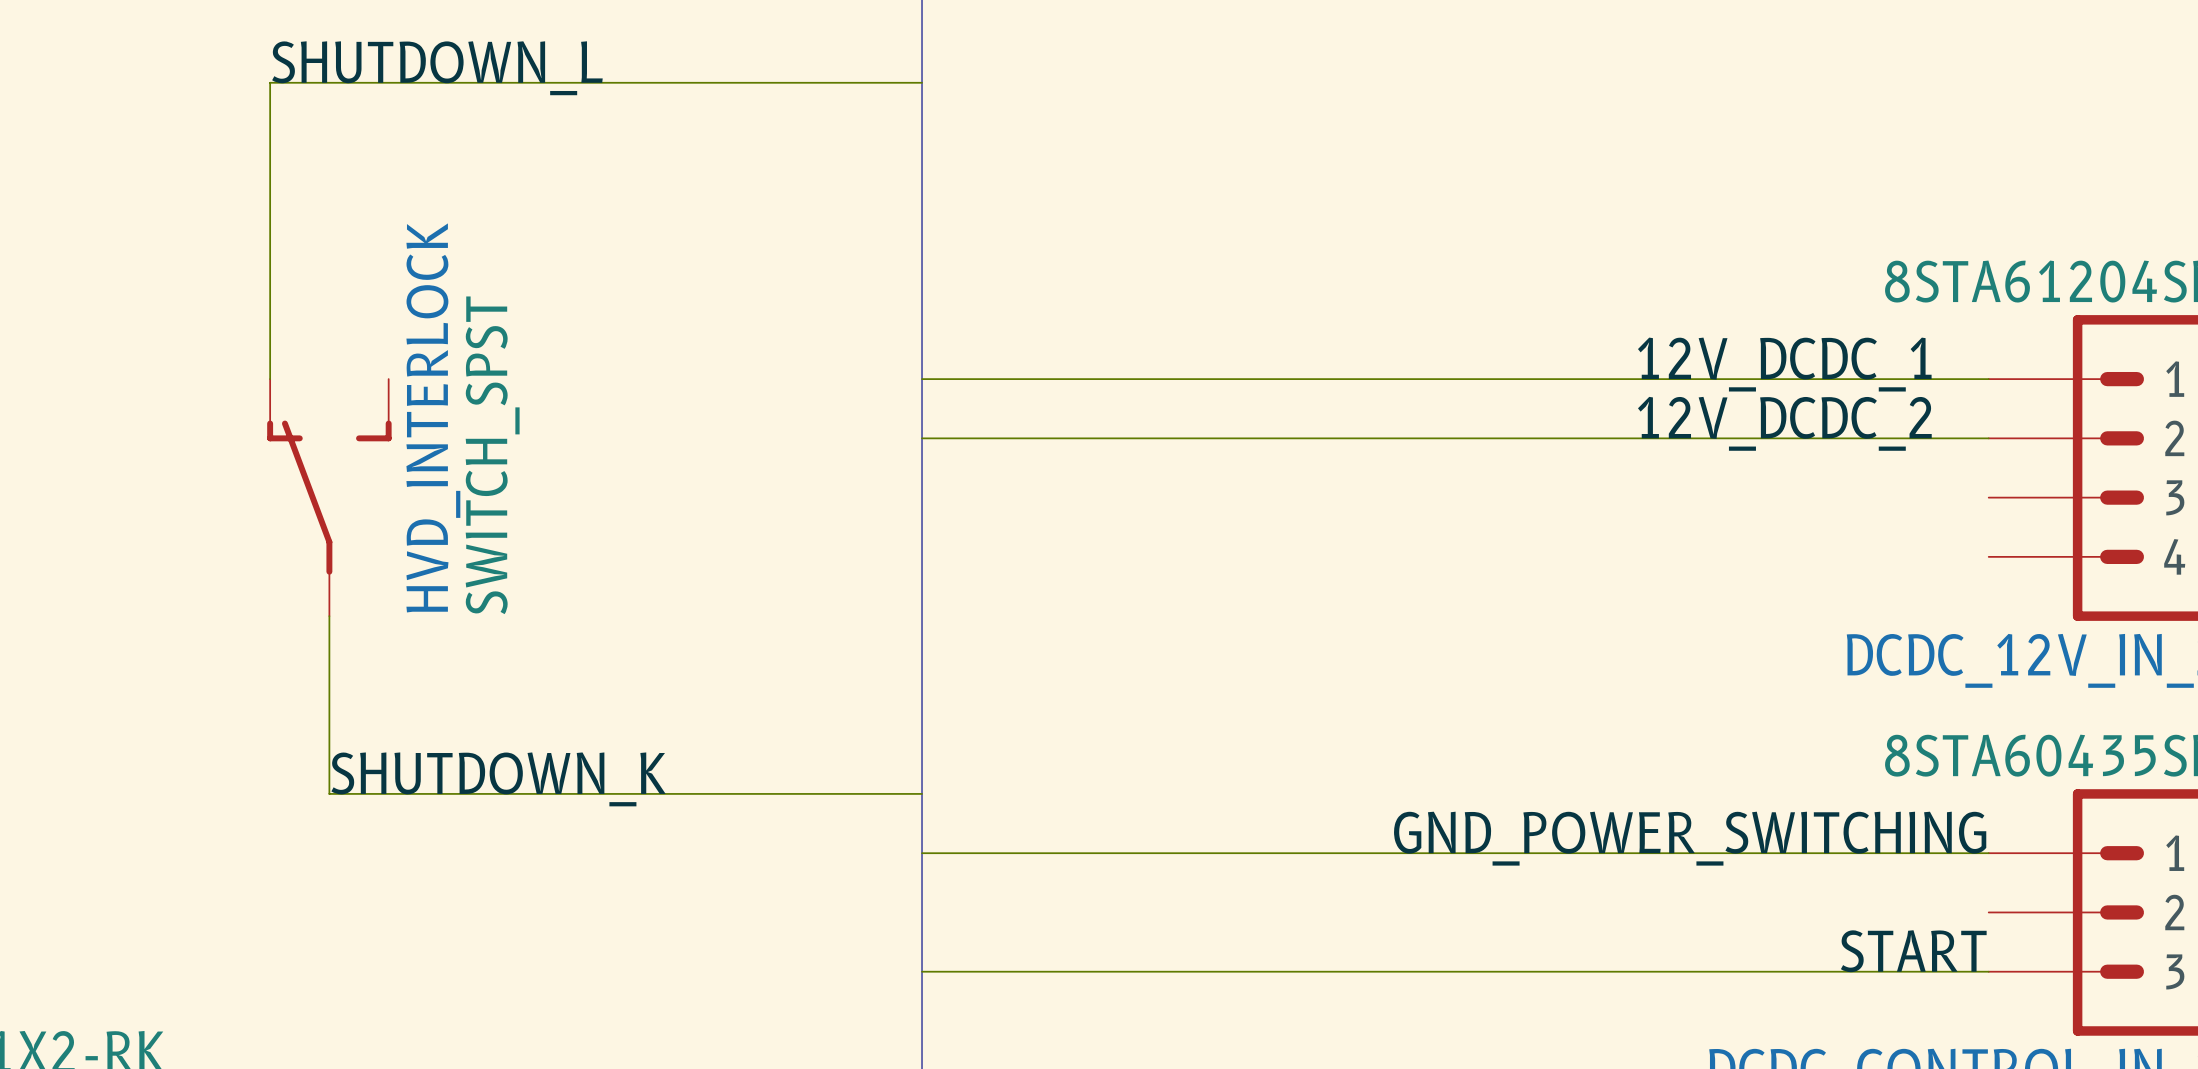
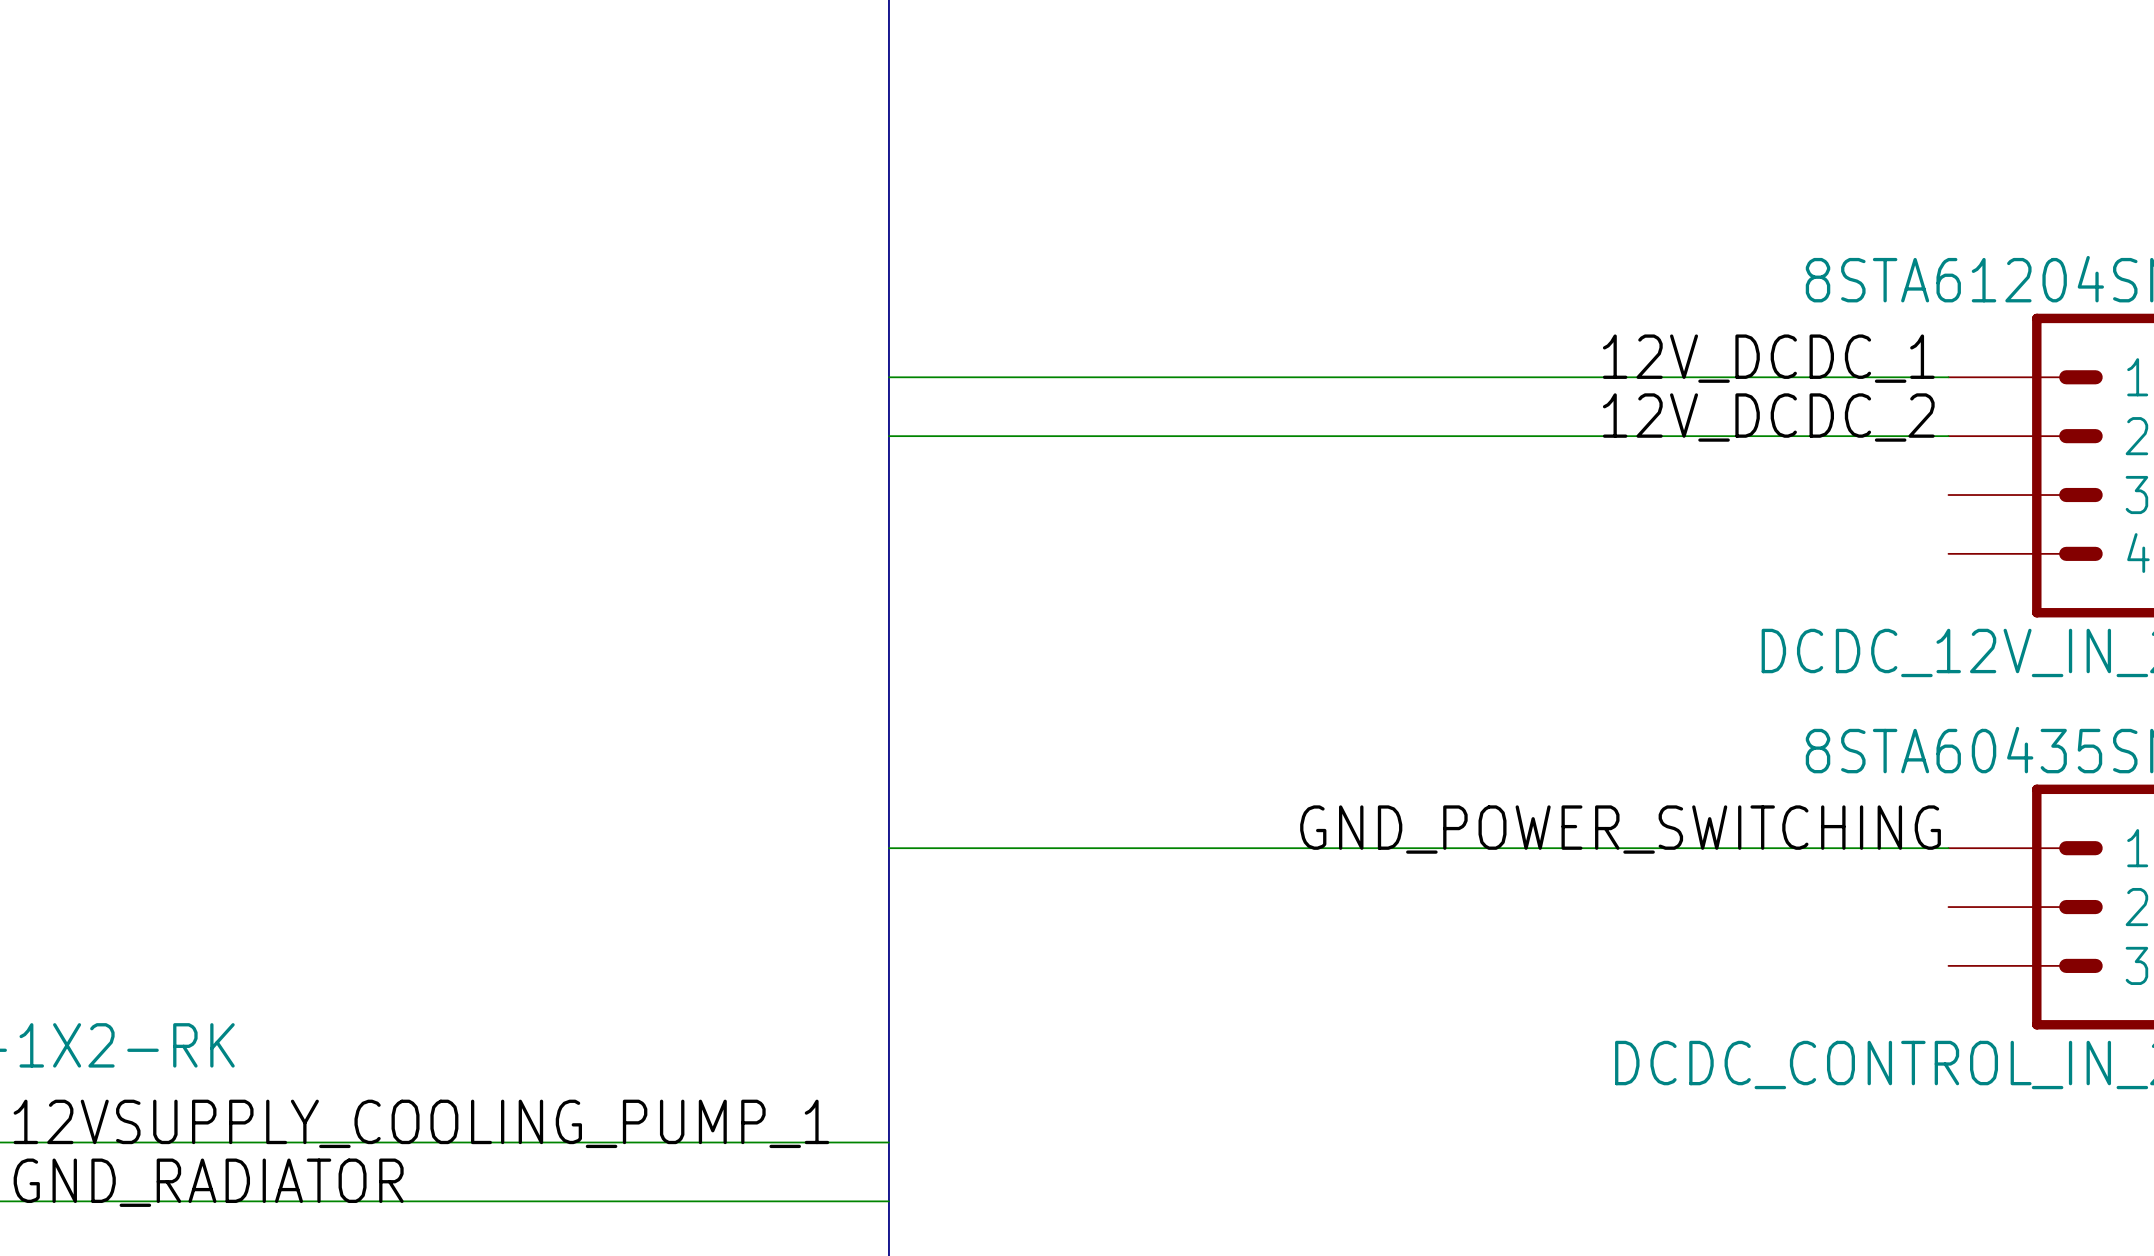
label: SHUTDOWN_L (437, 68) -> none
wire: (922, 82) (270, 82) (270, 379) -> none
HVD_INTERLOCK: SWITCH_SPST (329, 497) -> none
wire: (329, 616) (329, 793) (922, 793) -> none
label: SHUTDOWN_K (498, 779) -> none
label: START (1913, 951) -> none
wire: (922, 971) (1988, 971) -> none

